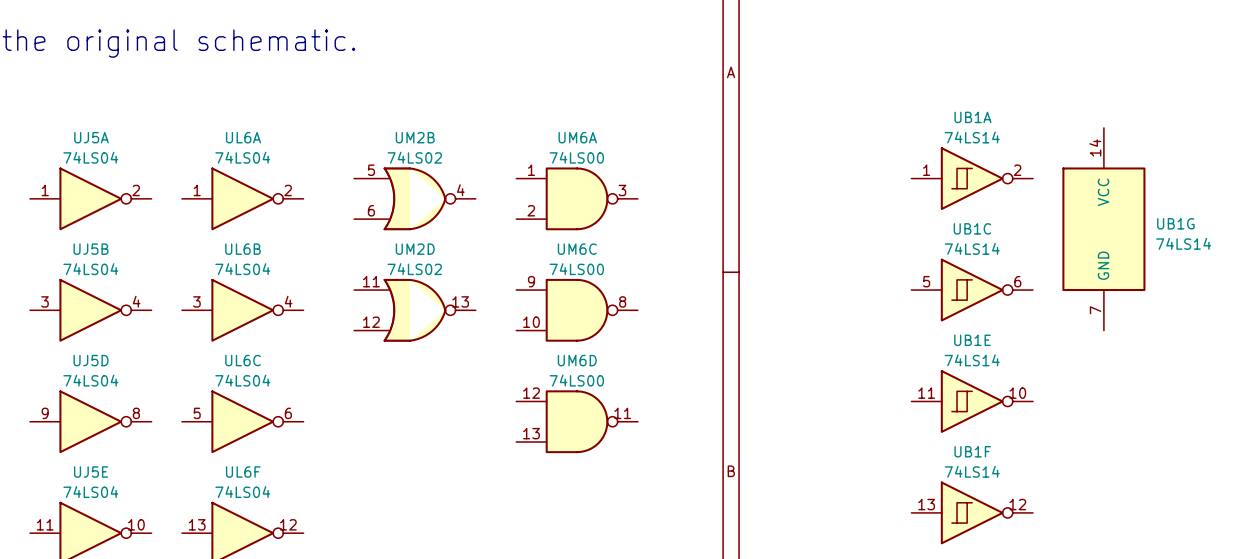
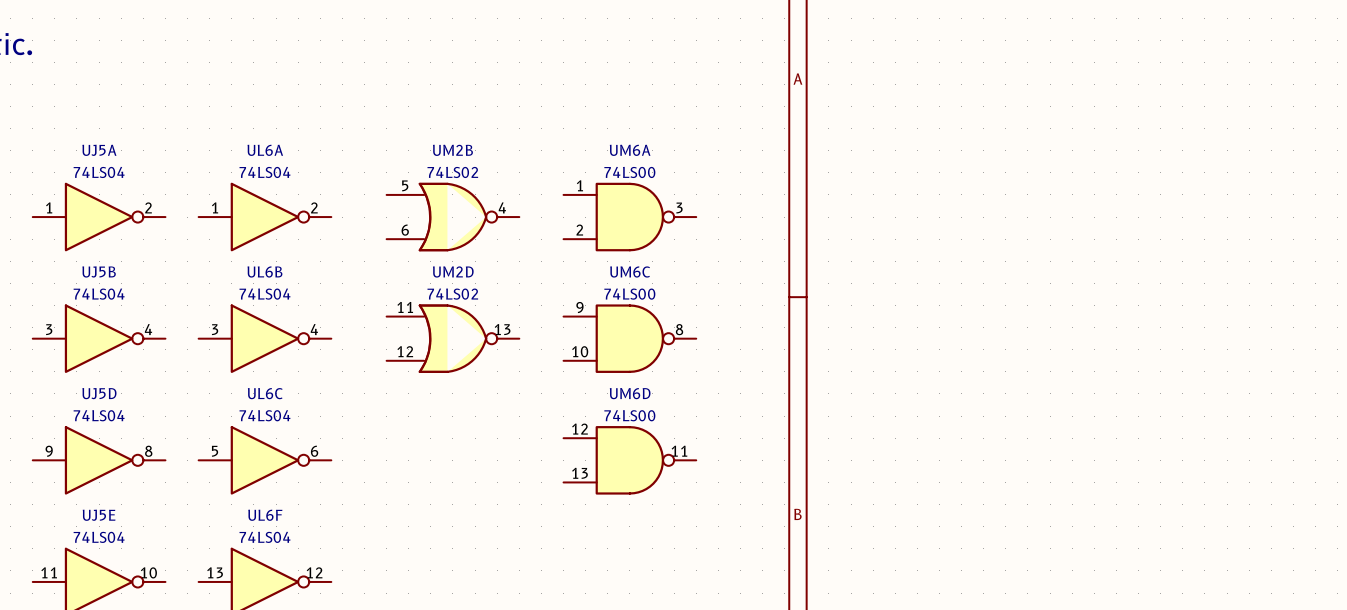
UB1A: 74LS14 (972, 178) -> none
UB1G: 74LS14 (1103, 229) -> none
UB1C: 74LS14 (972, 290) -> none
UB1E: 74LS14 (972, 401) -> none
UB1F: 74LS14 (972, 512) -> none

